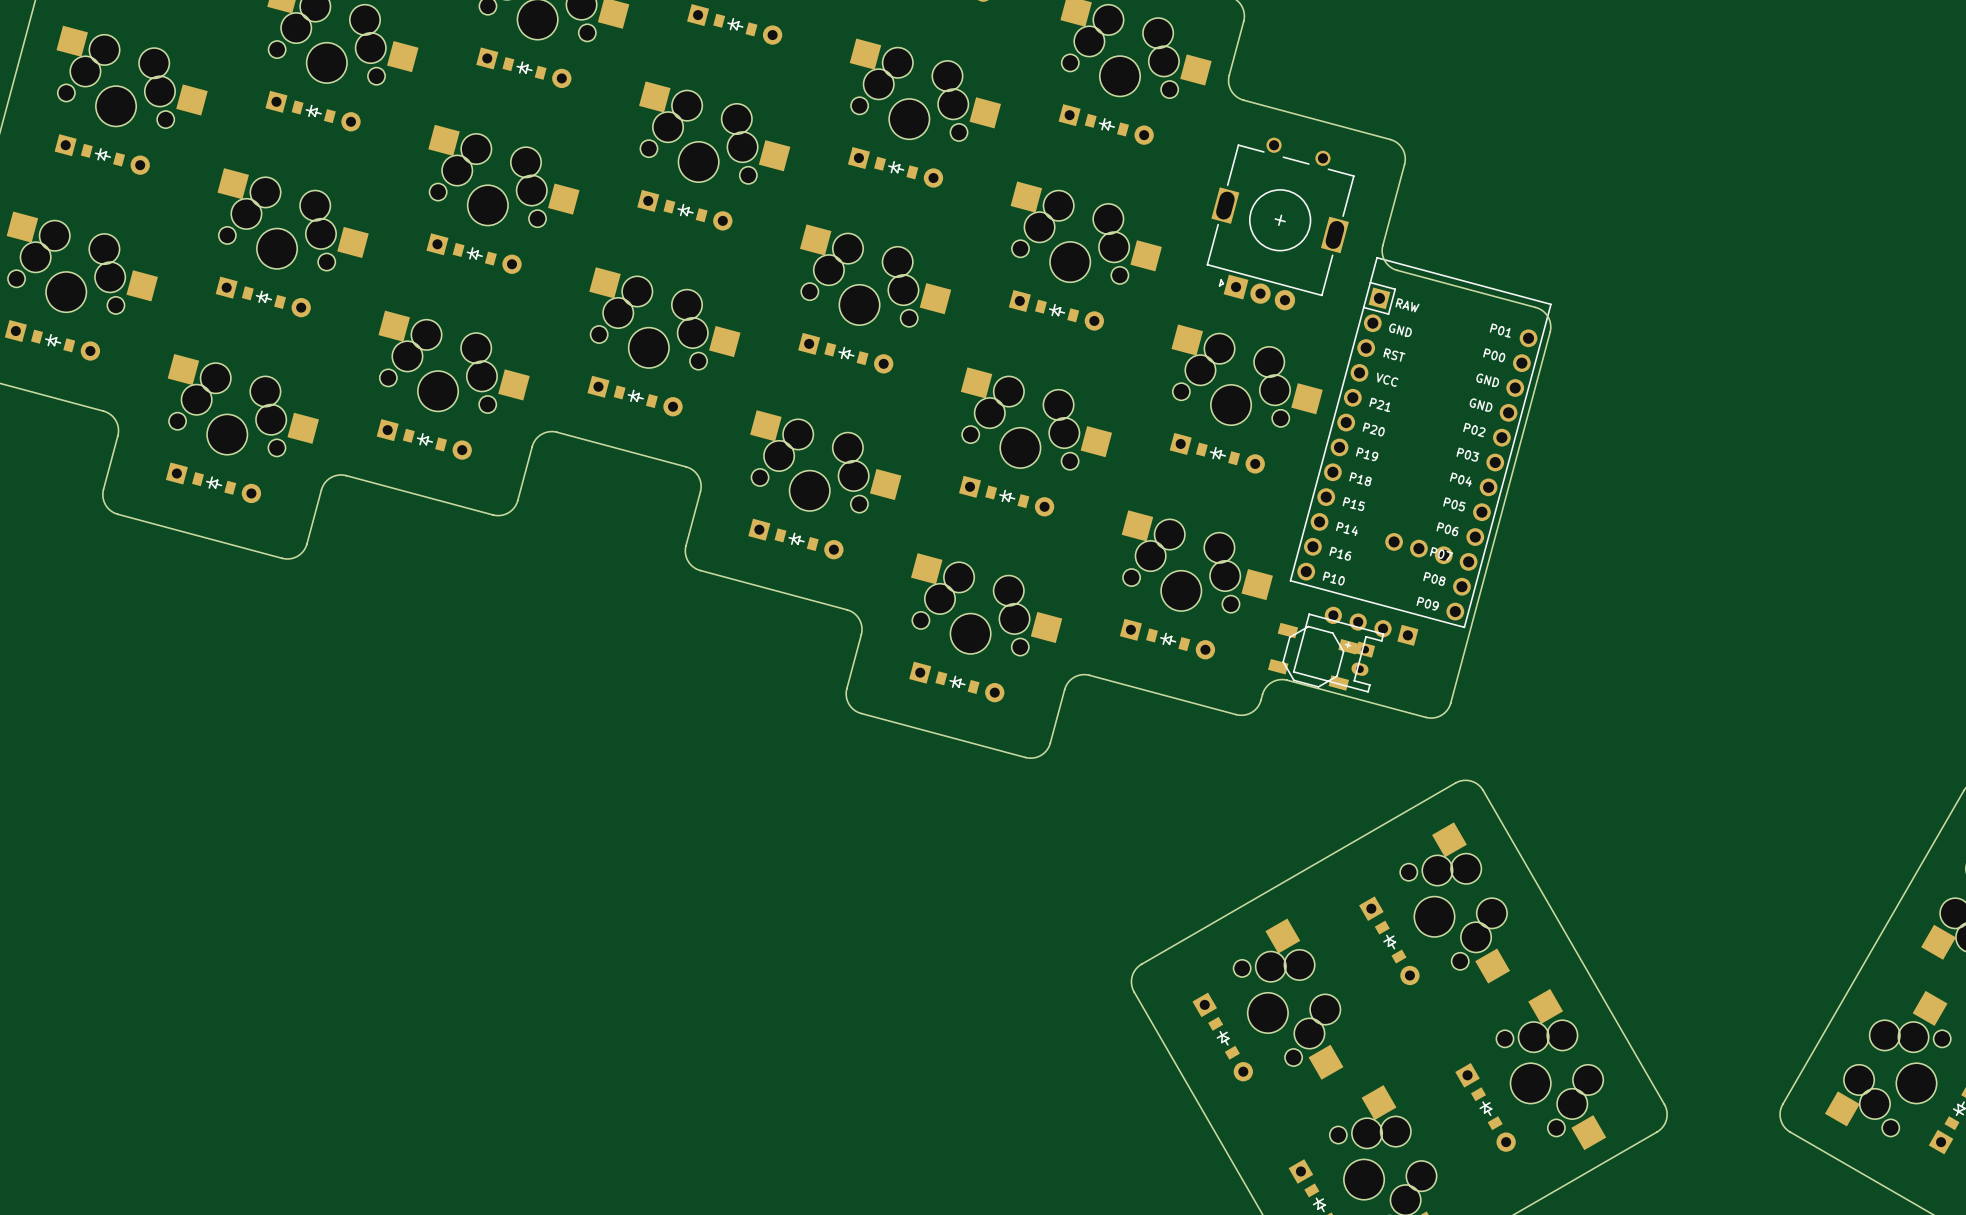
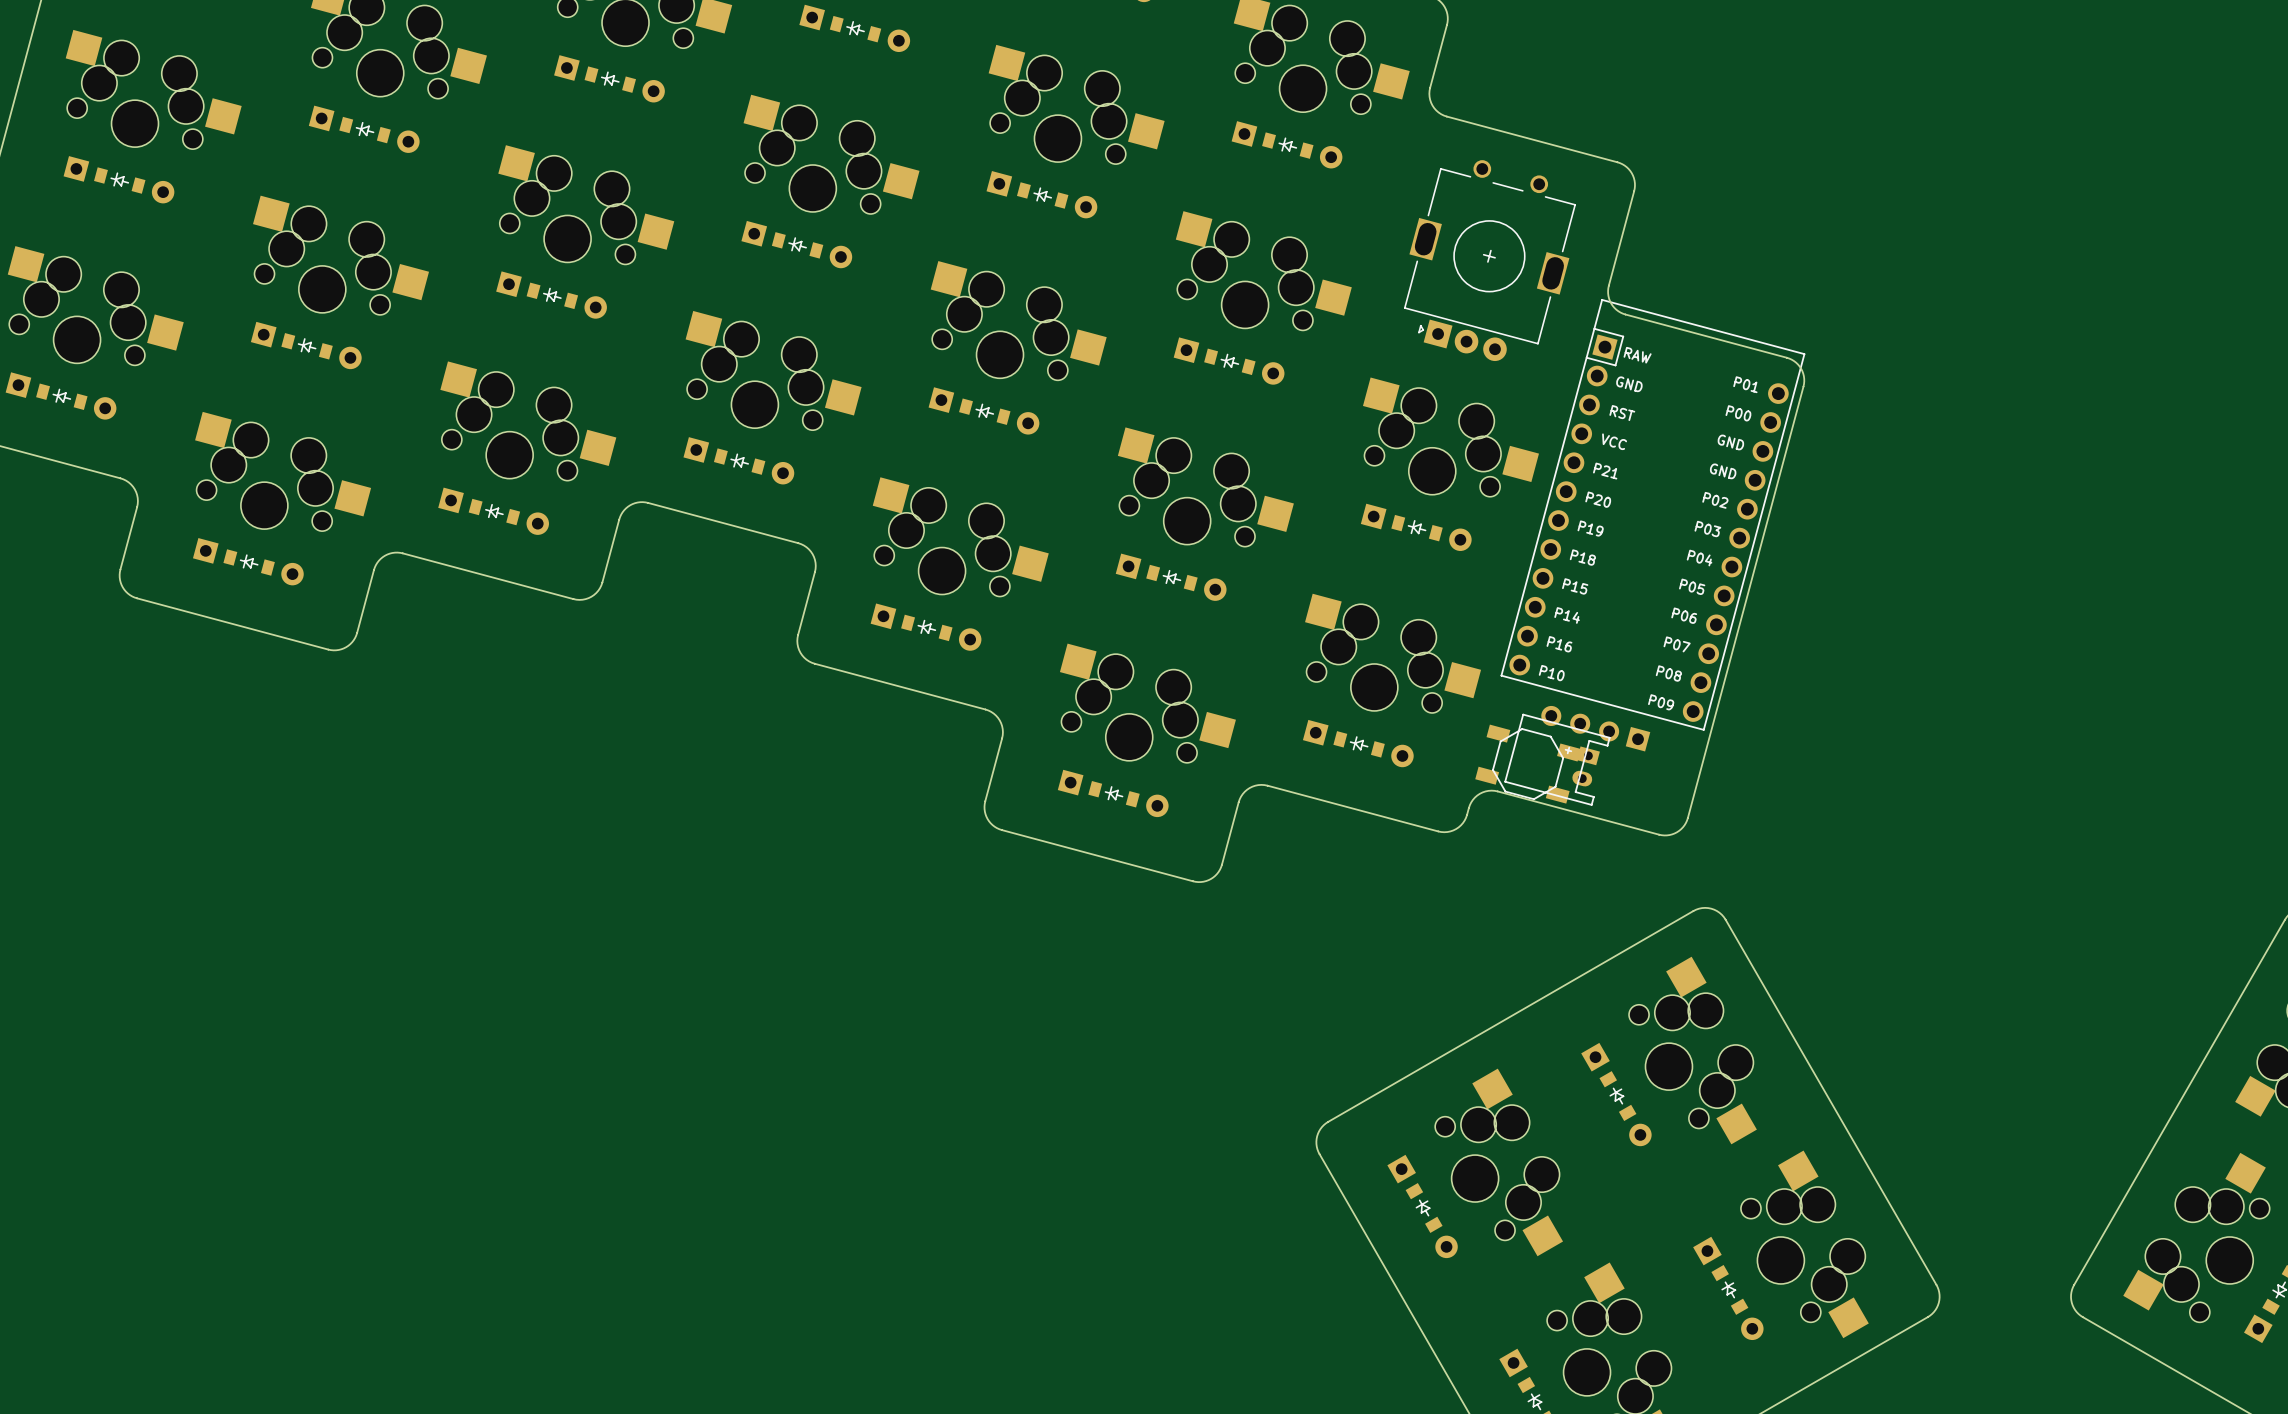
part footprint: [1289, 257, 1552, 629] -> [1500, 299, 1806, 731]

